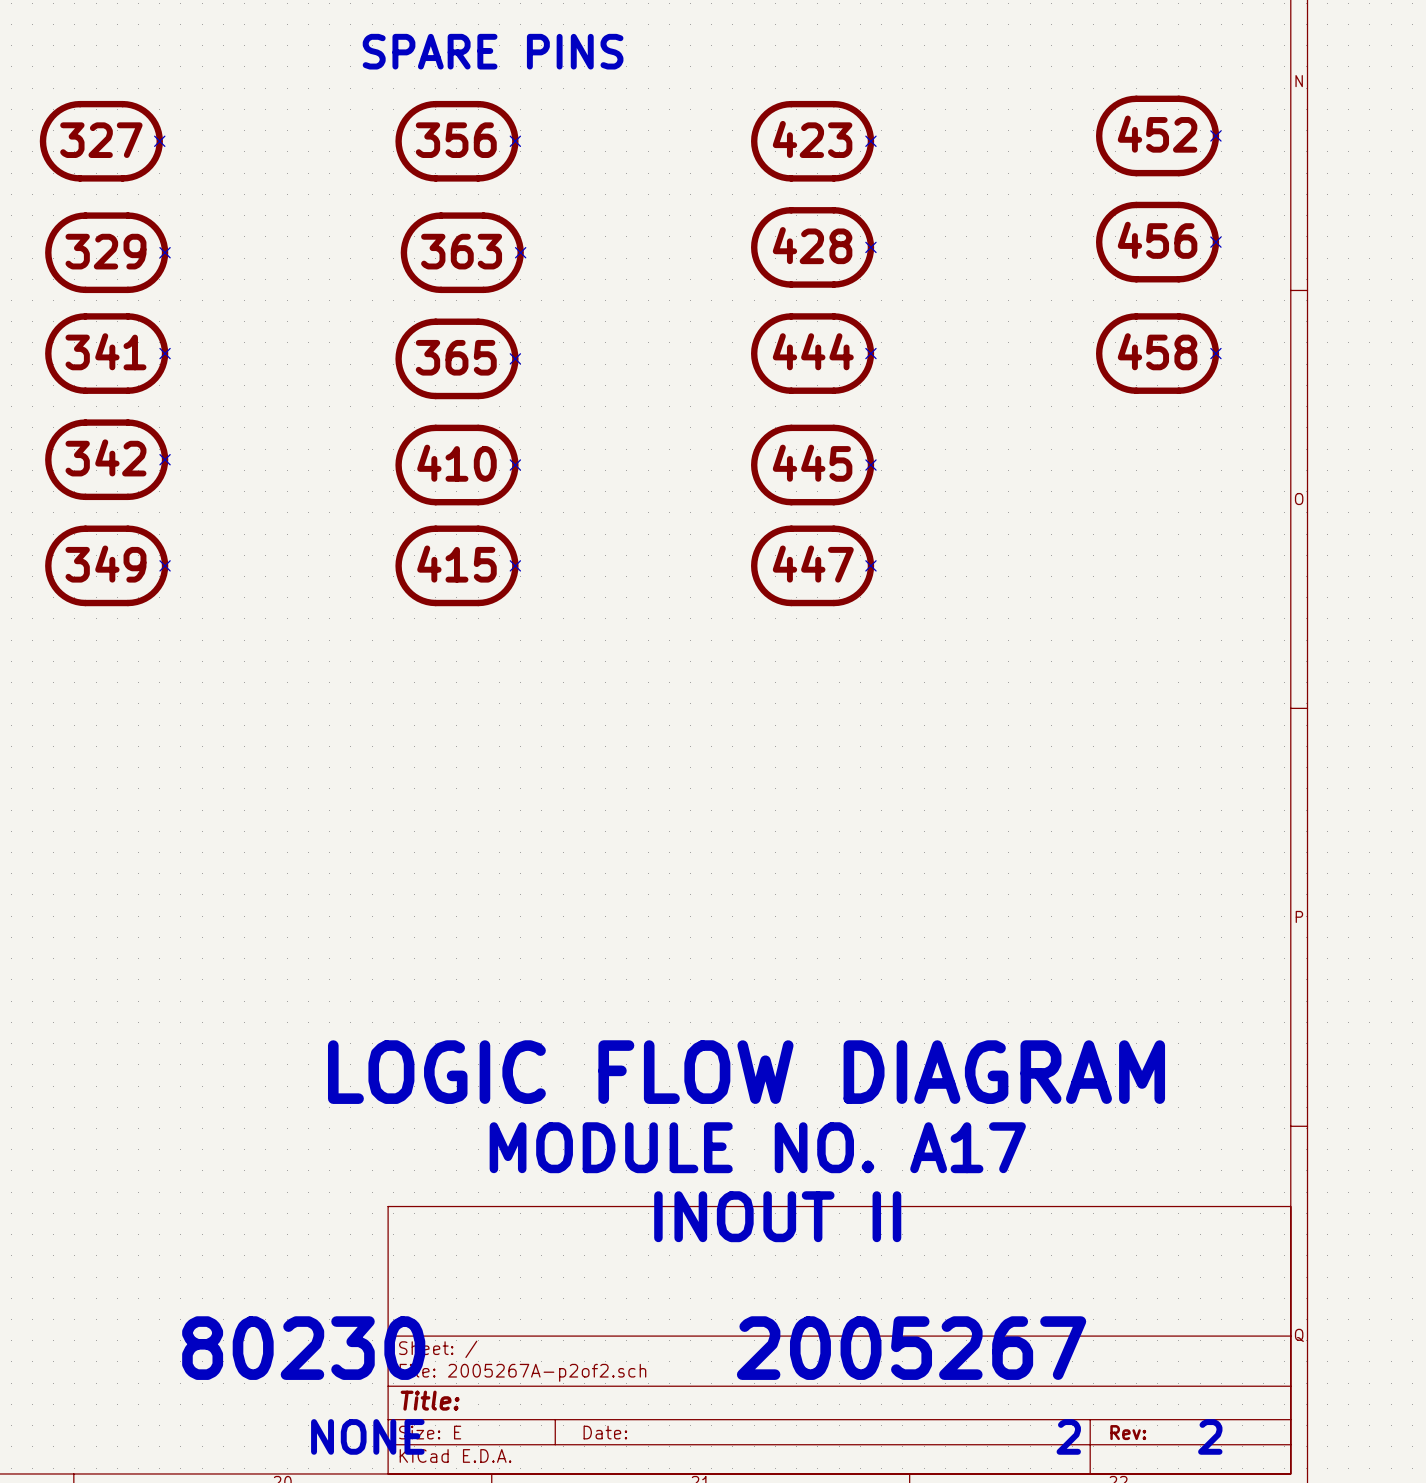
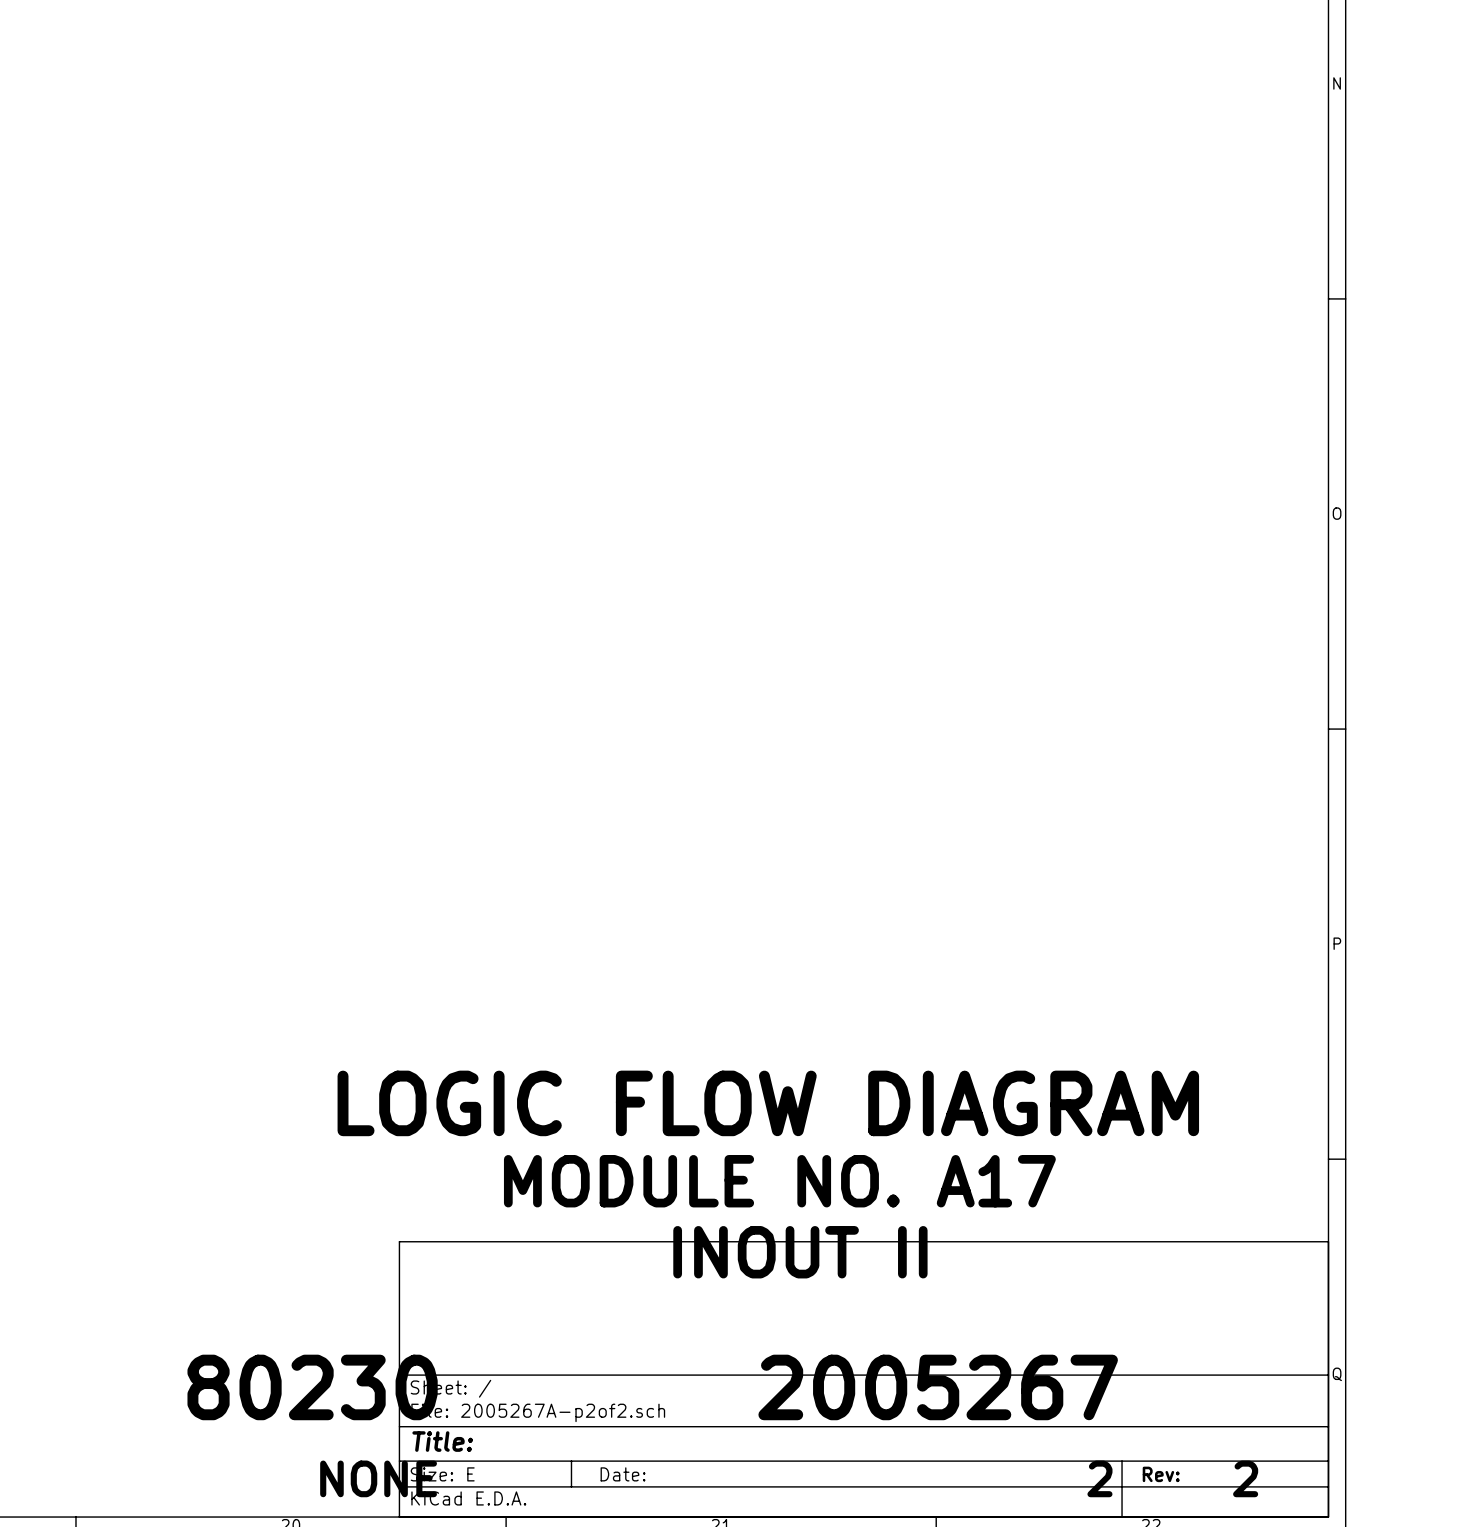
text: SPARE PINS (493, 51) -> none
part: (1157, 135) -> none
no-connect mark: (1215, 135) -> none
part: (101, 141) -> none
no-connect mark: (159, 141) -> none
part: (456, 141) -> none
no-connect mark: (515, 141) -> none
part: (812, 141) -> none
no-connect mark: (870, 141) -> none
part: (1157, 242) -> none
no-connect mark: (1215, 242) -> none
part: (812, 247) -> none
no-connect mark: (870, 247) -> none
part: (106, 252) -> none
no-connect mark: (165, 252) -> none
part: (462, 252) -> none
no-connect mark: (520, 252) -> none
part: (106, 353) -> none
no-connect mark: (165, 353) -> none
part: (812, 353) -> none
no-connect mark: (870, 353) -> none
part: (1157, 353) -> none
no-connect mark: (1215, 353) -> none
part: (456, 358) -> none
no-connect mark: (515, 358) -> none
part: (106, 459) -> none
no-connect mark: (165, 459) -> none
part: (456, 465) -> none
no-connect mark: (515, 465) -> none
part: (812, 465) -> none
no-connect mark: (870, 465) -> none
part: (106, 565) -> none
no-connect mark: (165, 565) -> none
part: (456, 565) -> none
no-connect mark: (515, 565) -> none
part: (812, 565) -> none
no-connect mark: (870, 565) -> none

